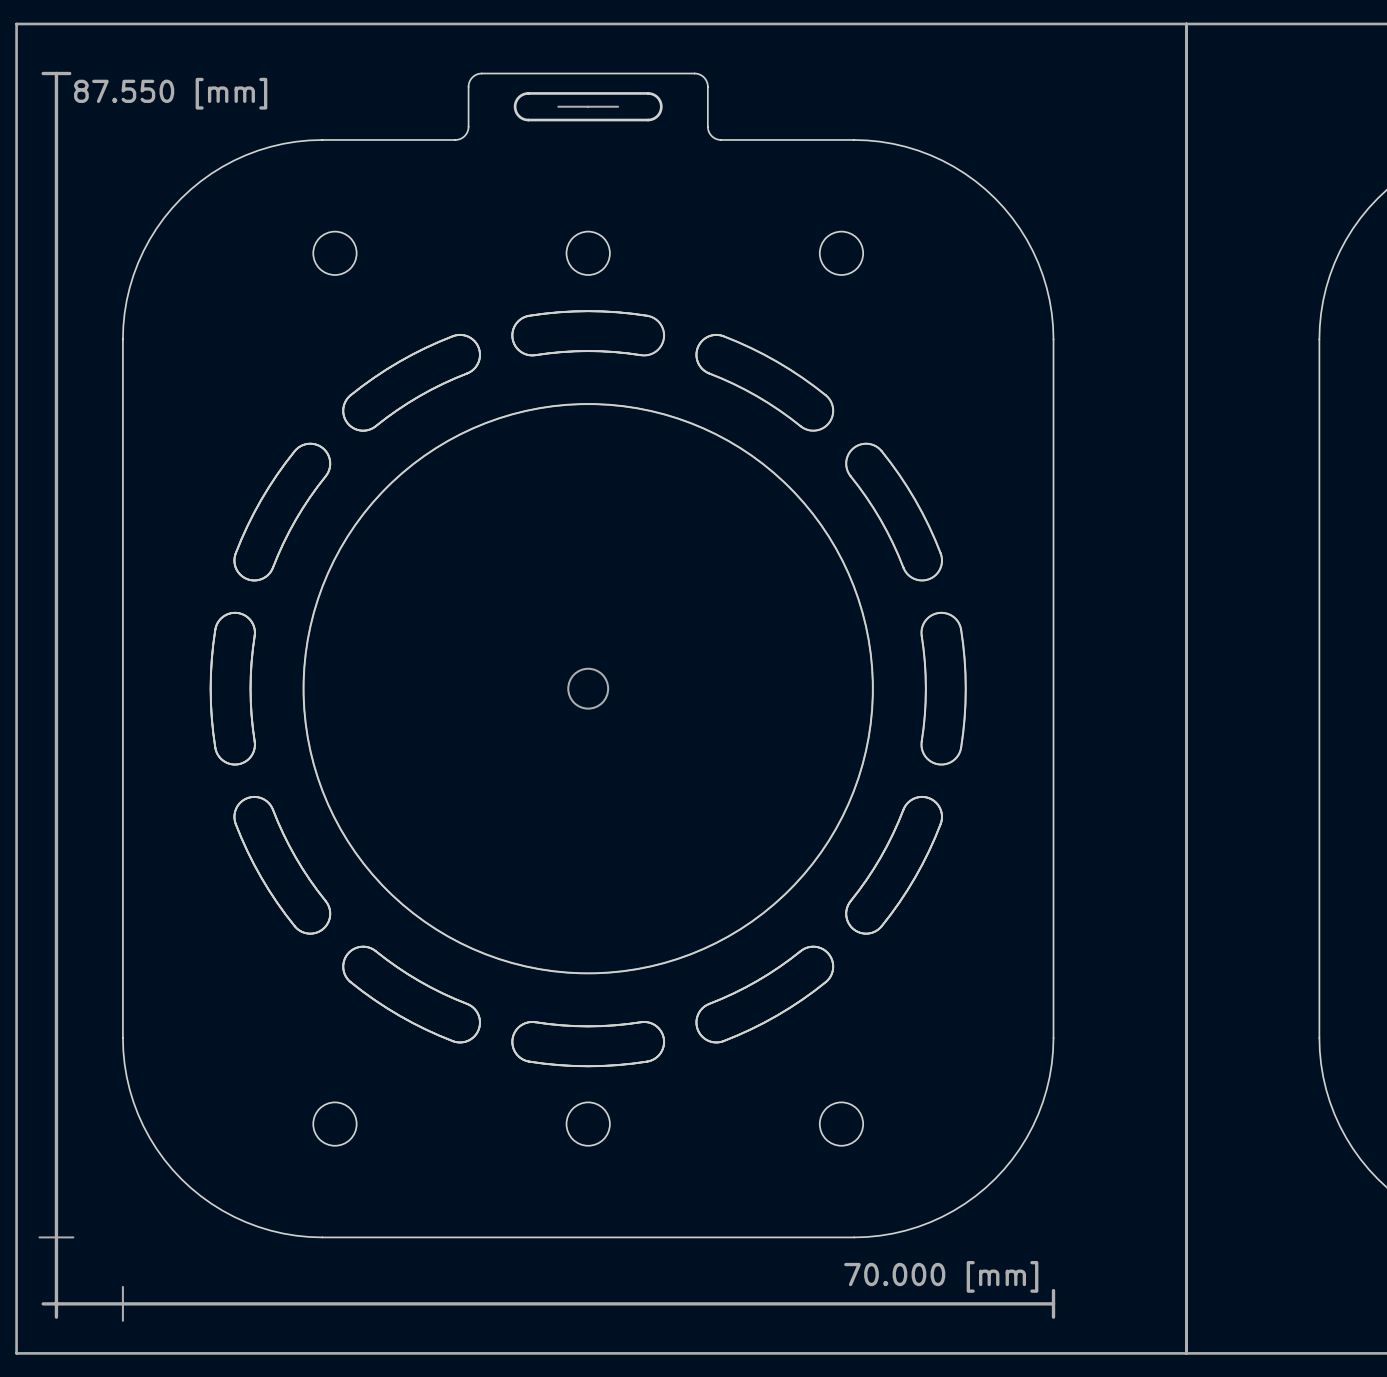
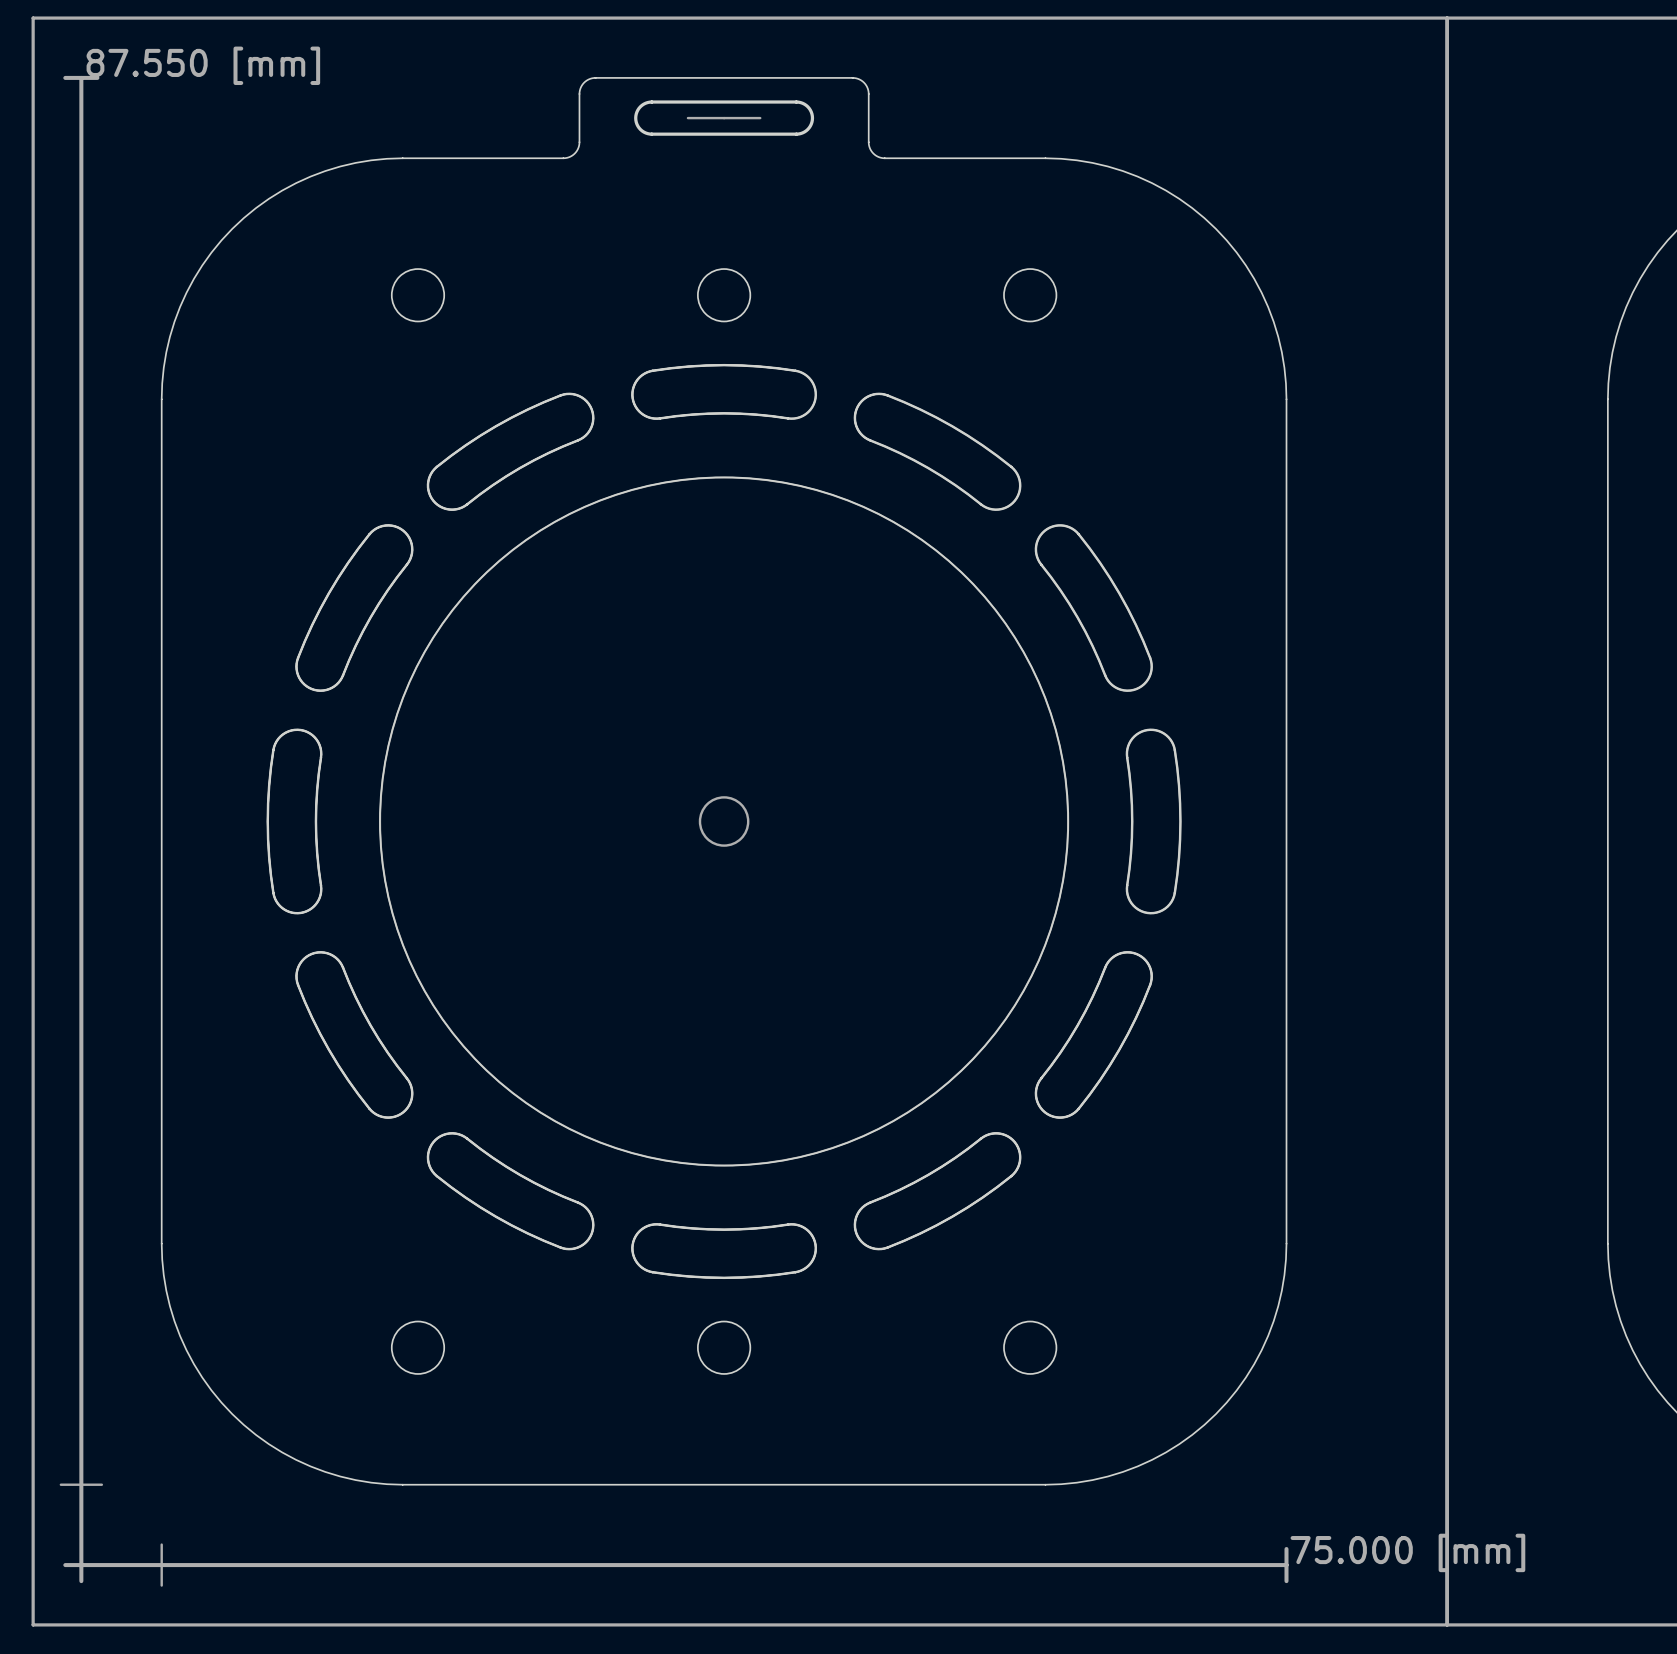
text position: 87.550 [mm] (170, 93) -> 87.550 [mm] (203, 65)
text: 70.000 [mm] (941, 1276) -> 75.000 [mm] (1407, 1552)

